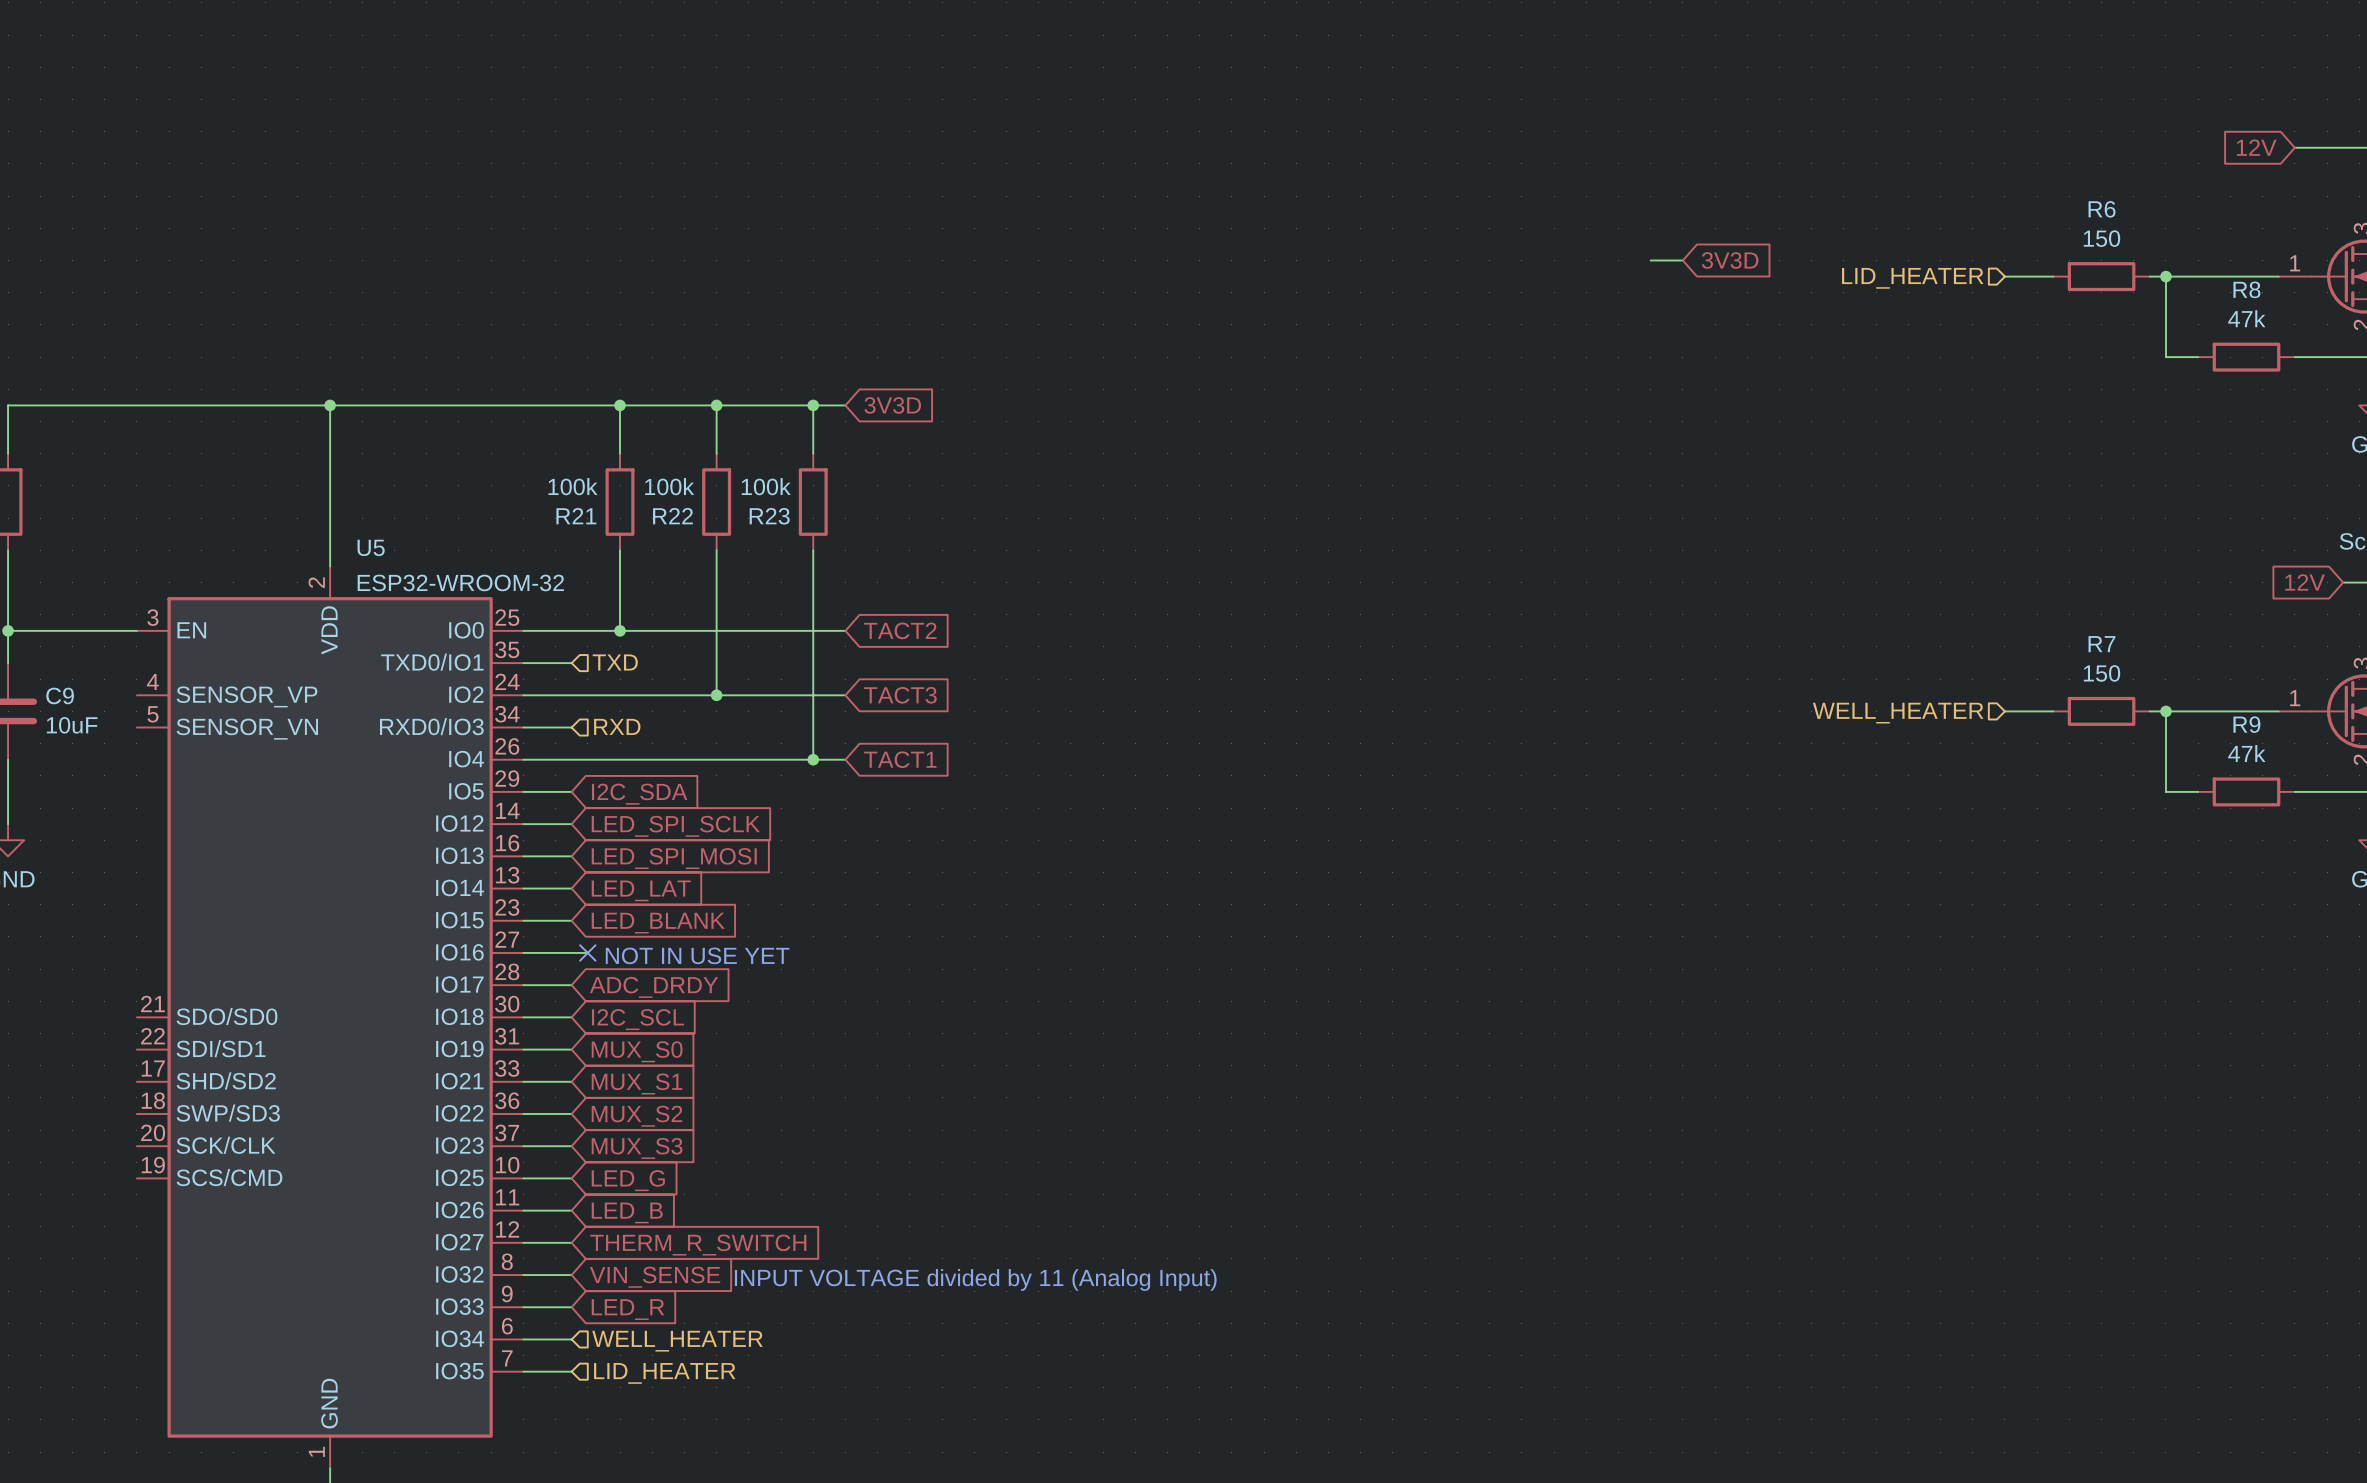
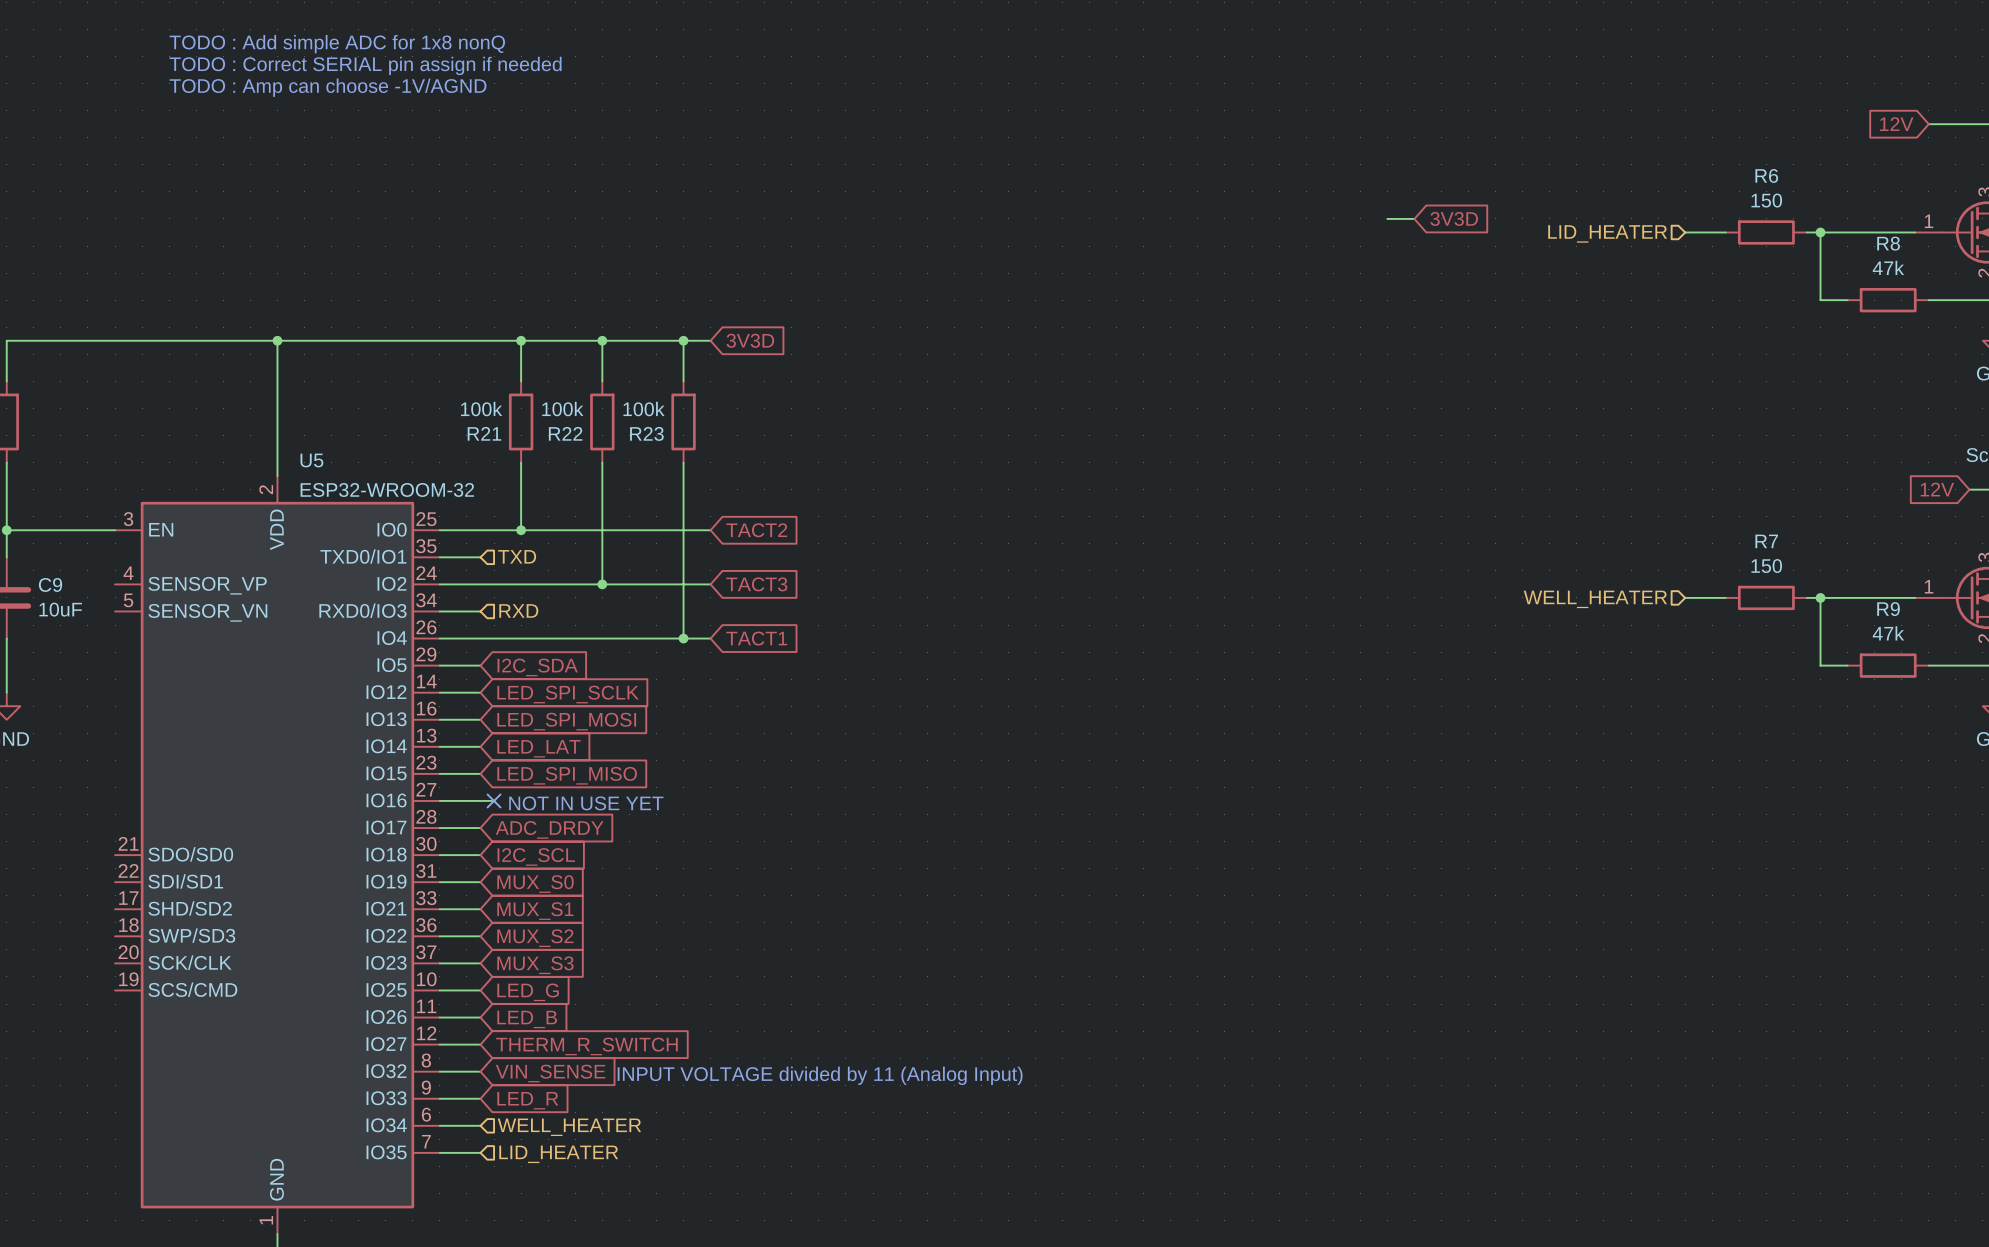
text: none -> TODO : Add simple ADC for 1x8 nonQ (337, 44)
text: none -> TODO : Correct SERIAL pin assign if needed (365, 65)
text: none -> TODO : Amp can choose -1V/AGND (328, 87)
global label: LED_BLANK (658, 923) -> LED_SPI_MISO (567, 775)

